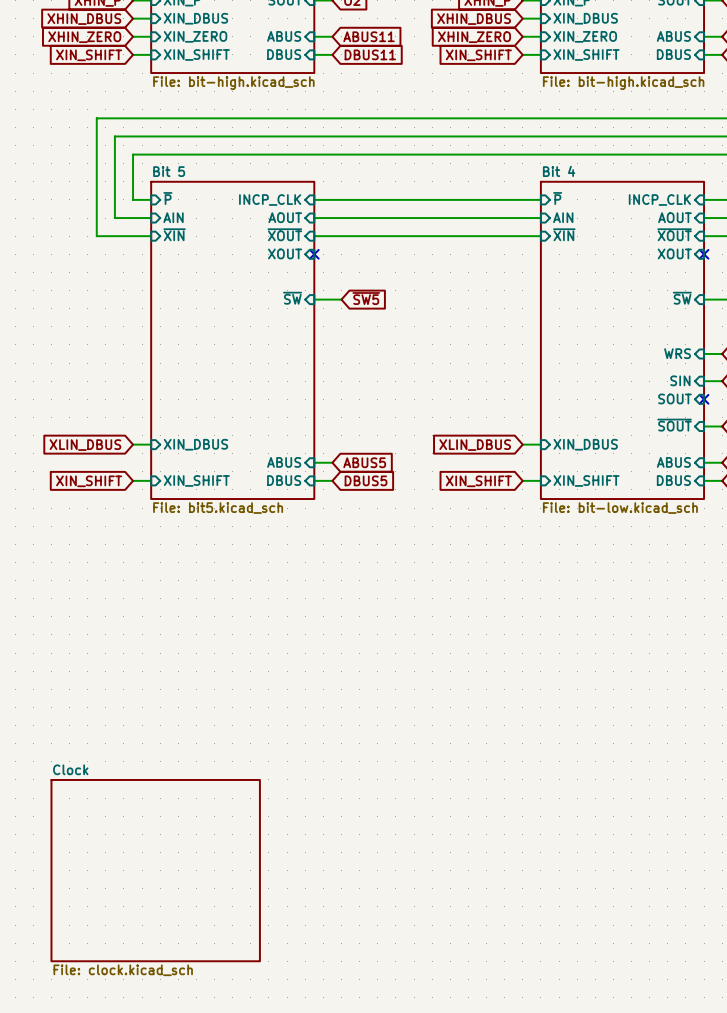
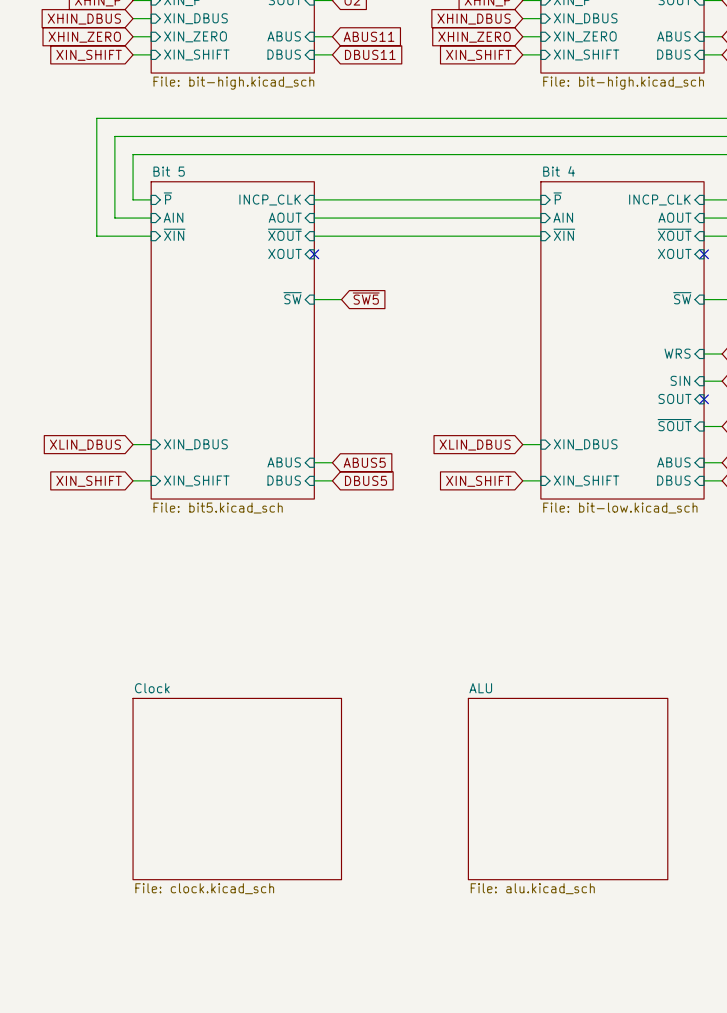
sheet ALU: none -> File: alu.kicad_sch (568, 789)
sheet Clock position: (155, 870) -> (237, 789)

